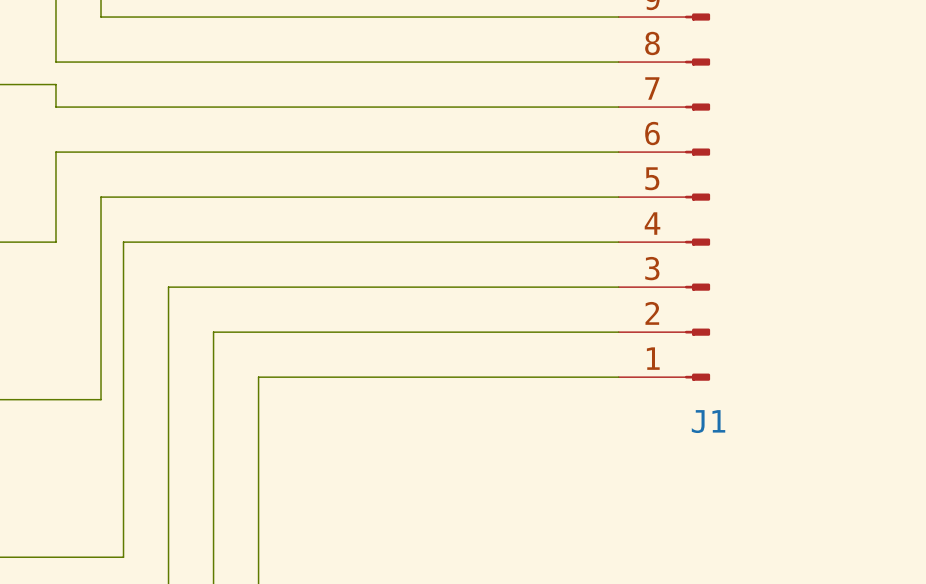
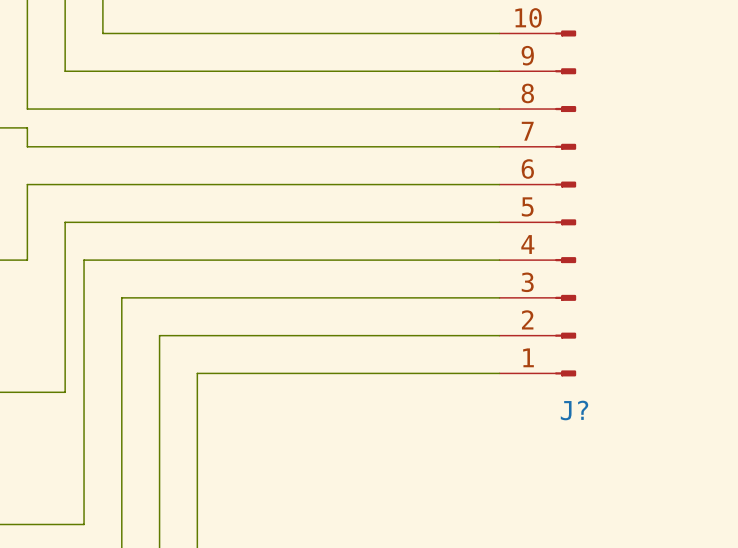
J1 name: J1 (708, 421) -> J? (574, 410)

